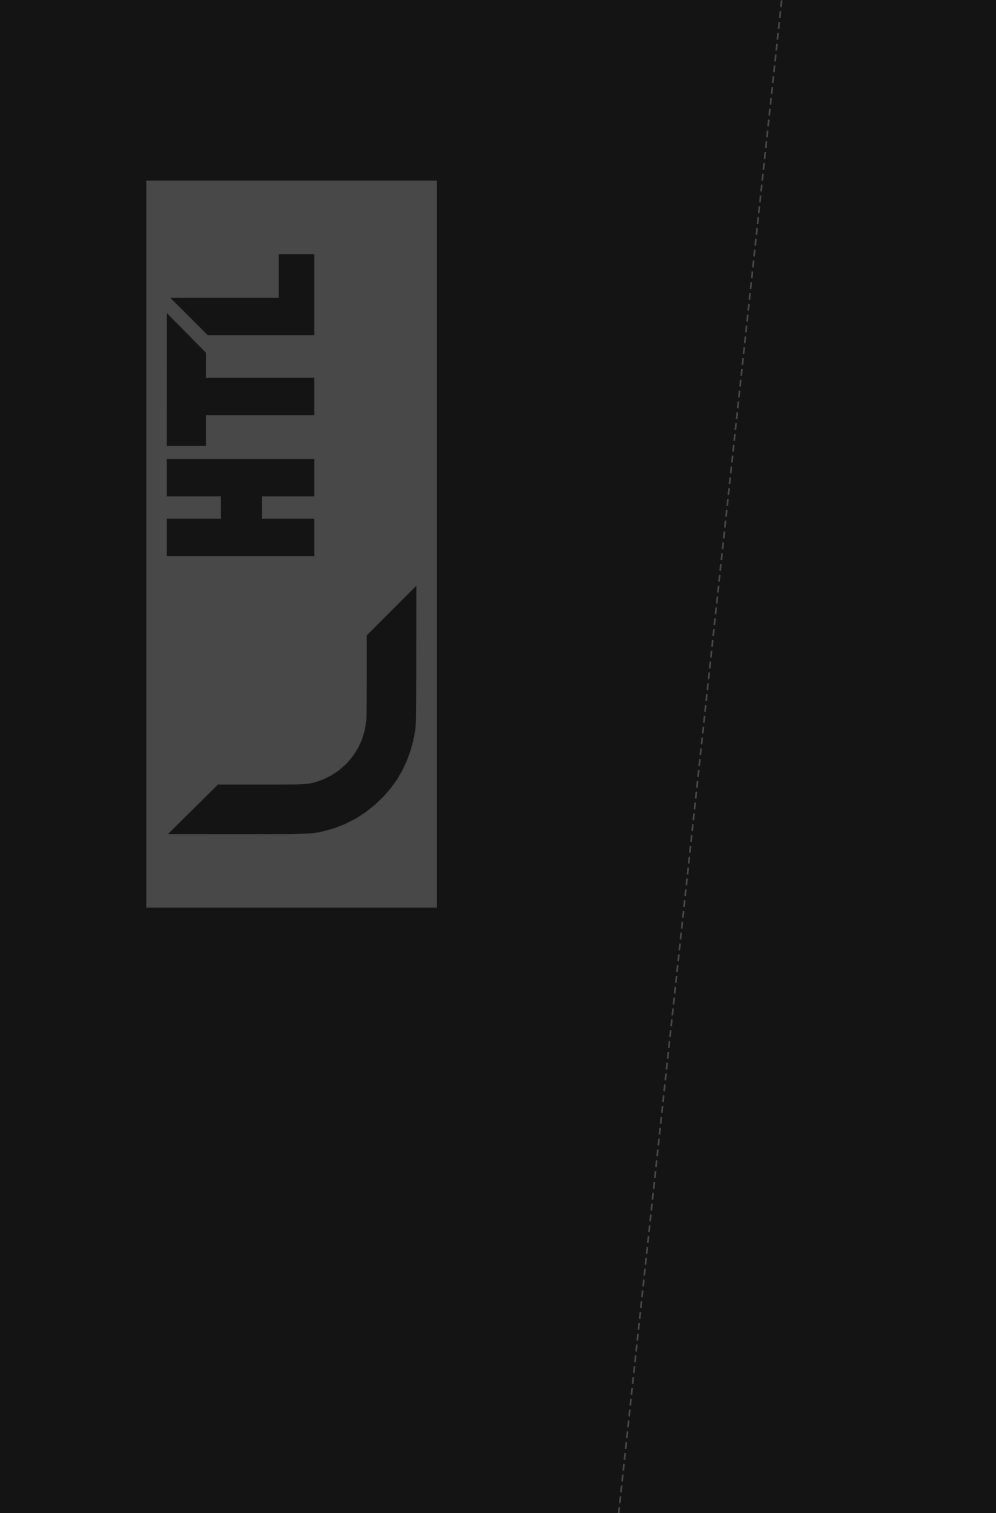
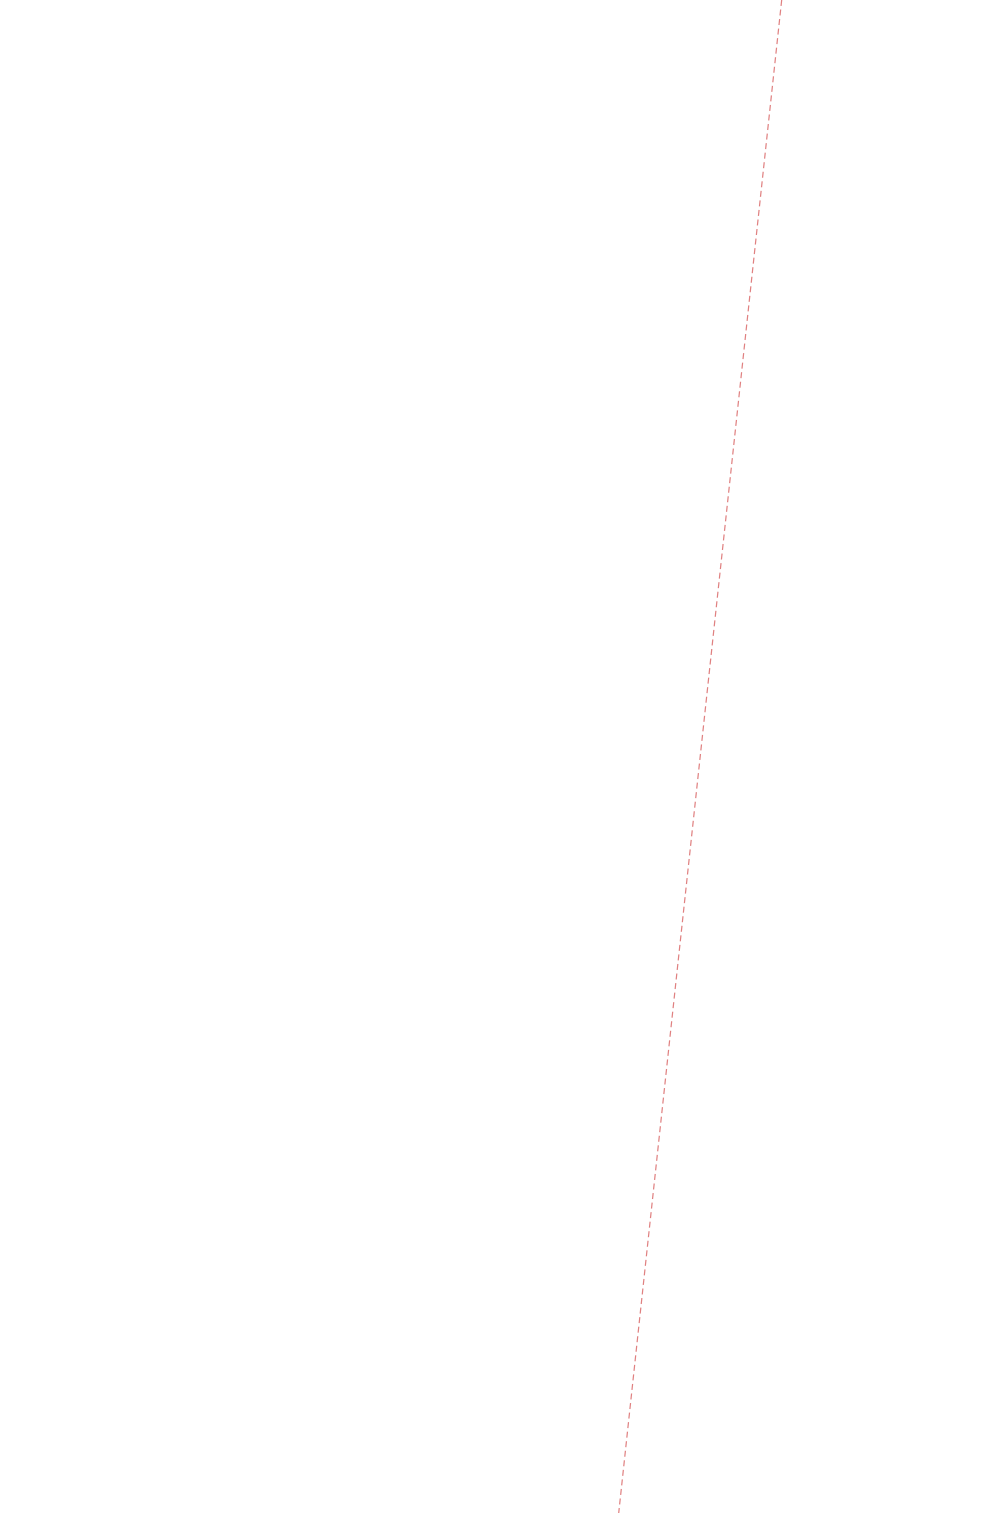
drawing: [146, 180, 437, 908] -> none

